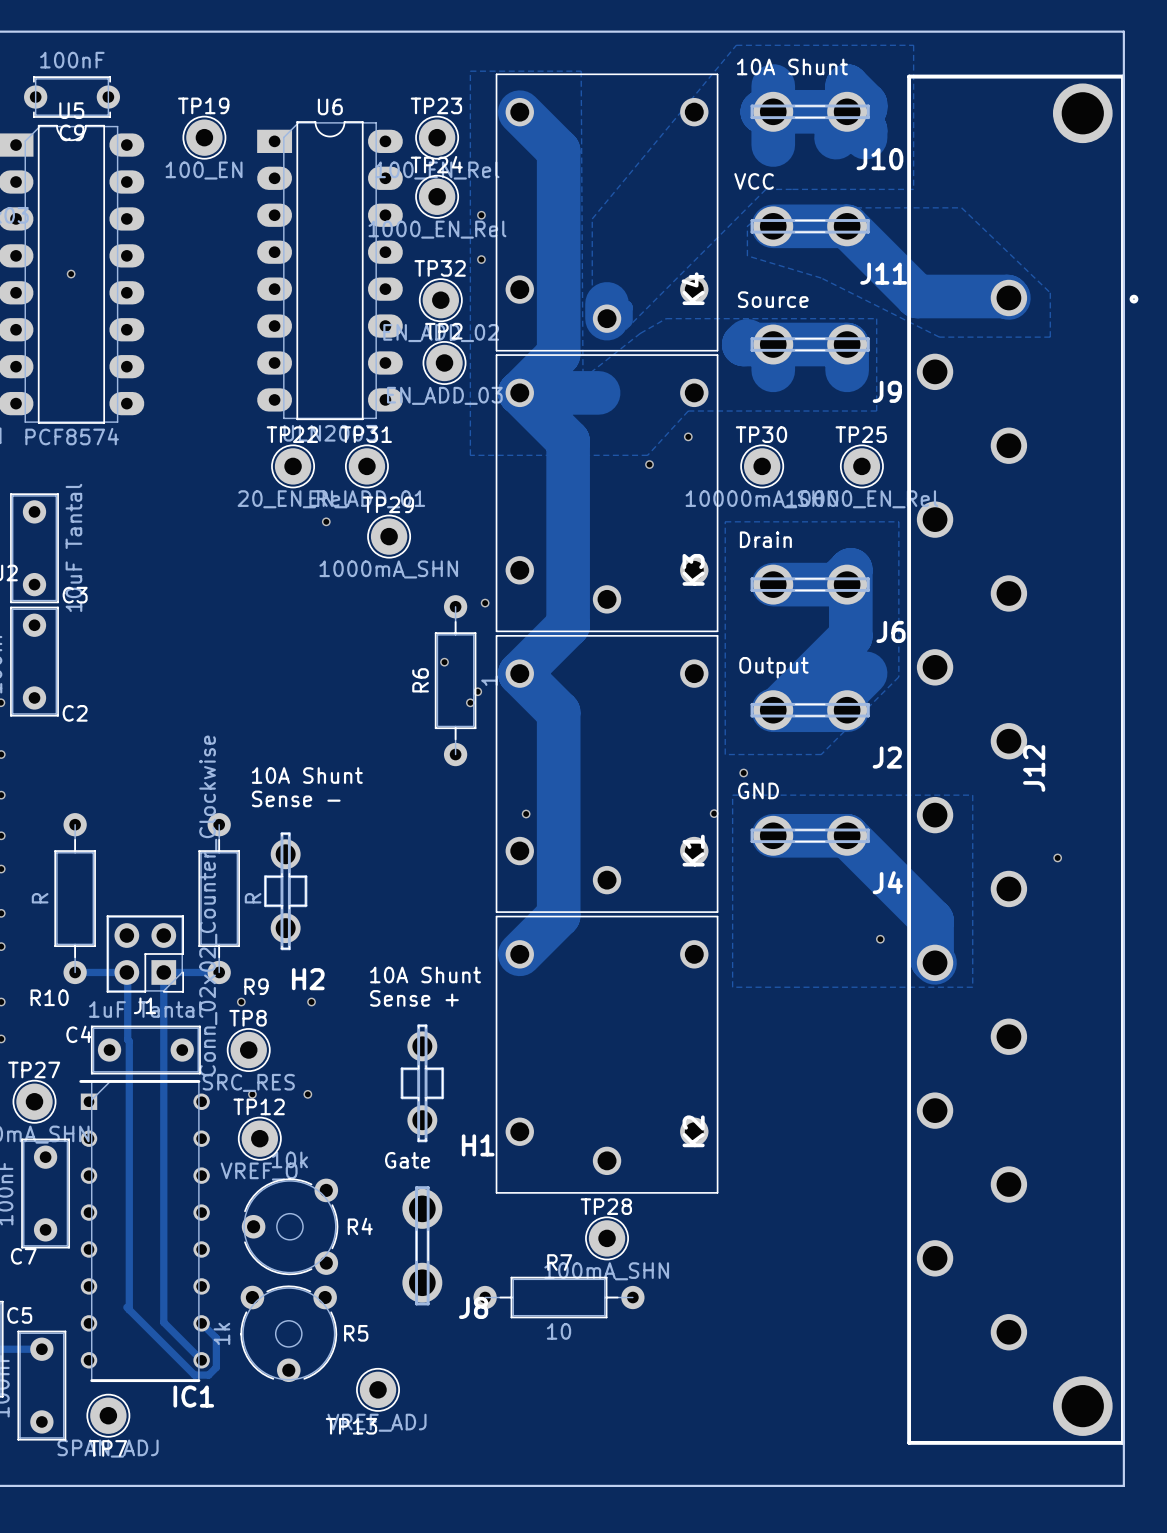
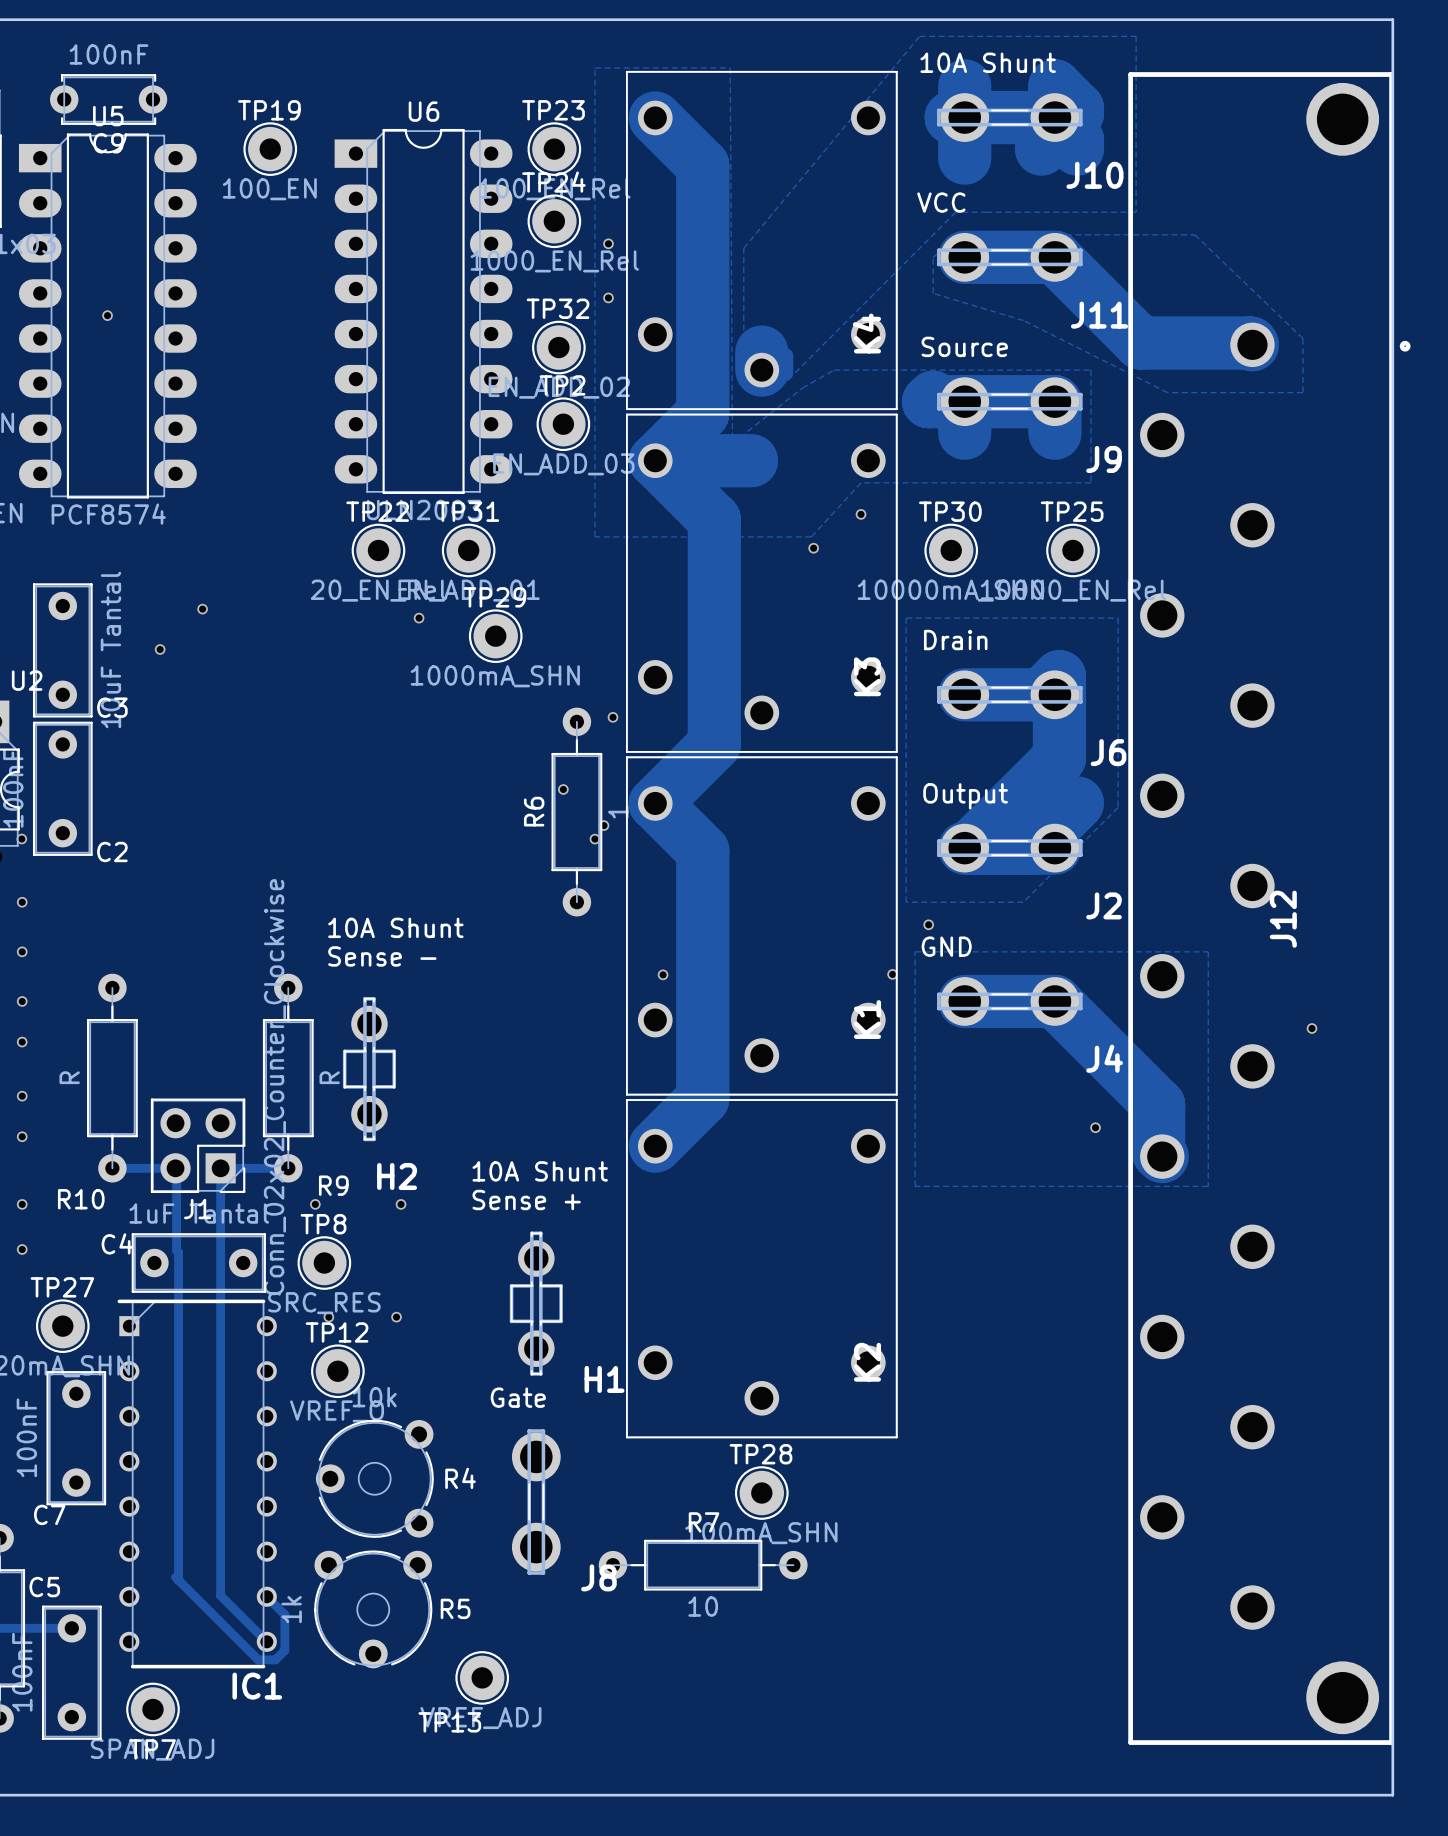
via: none -> (202, 609)
via: none -> (160, 649)

